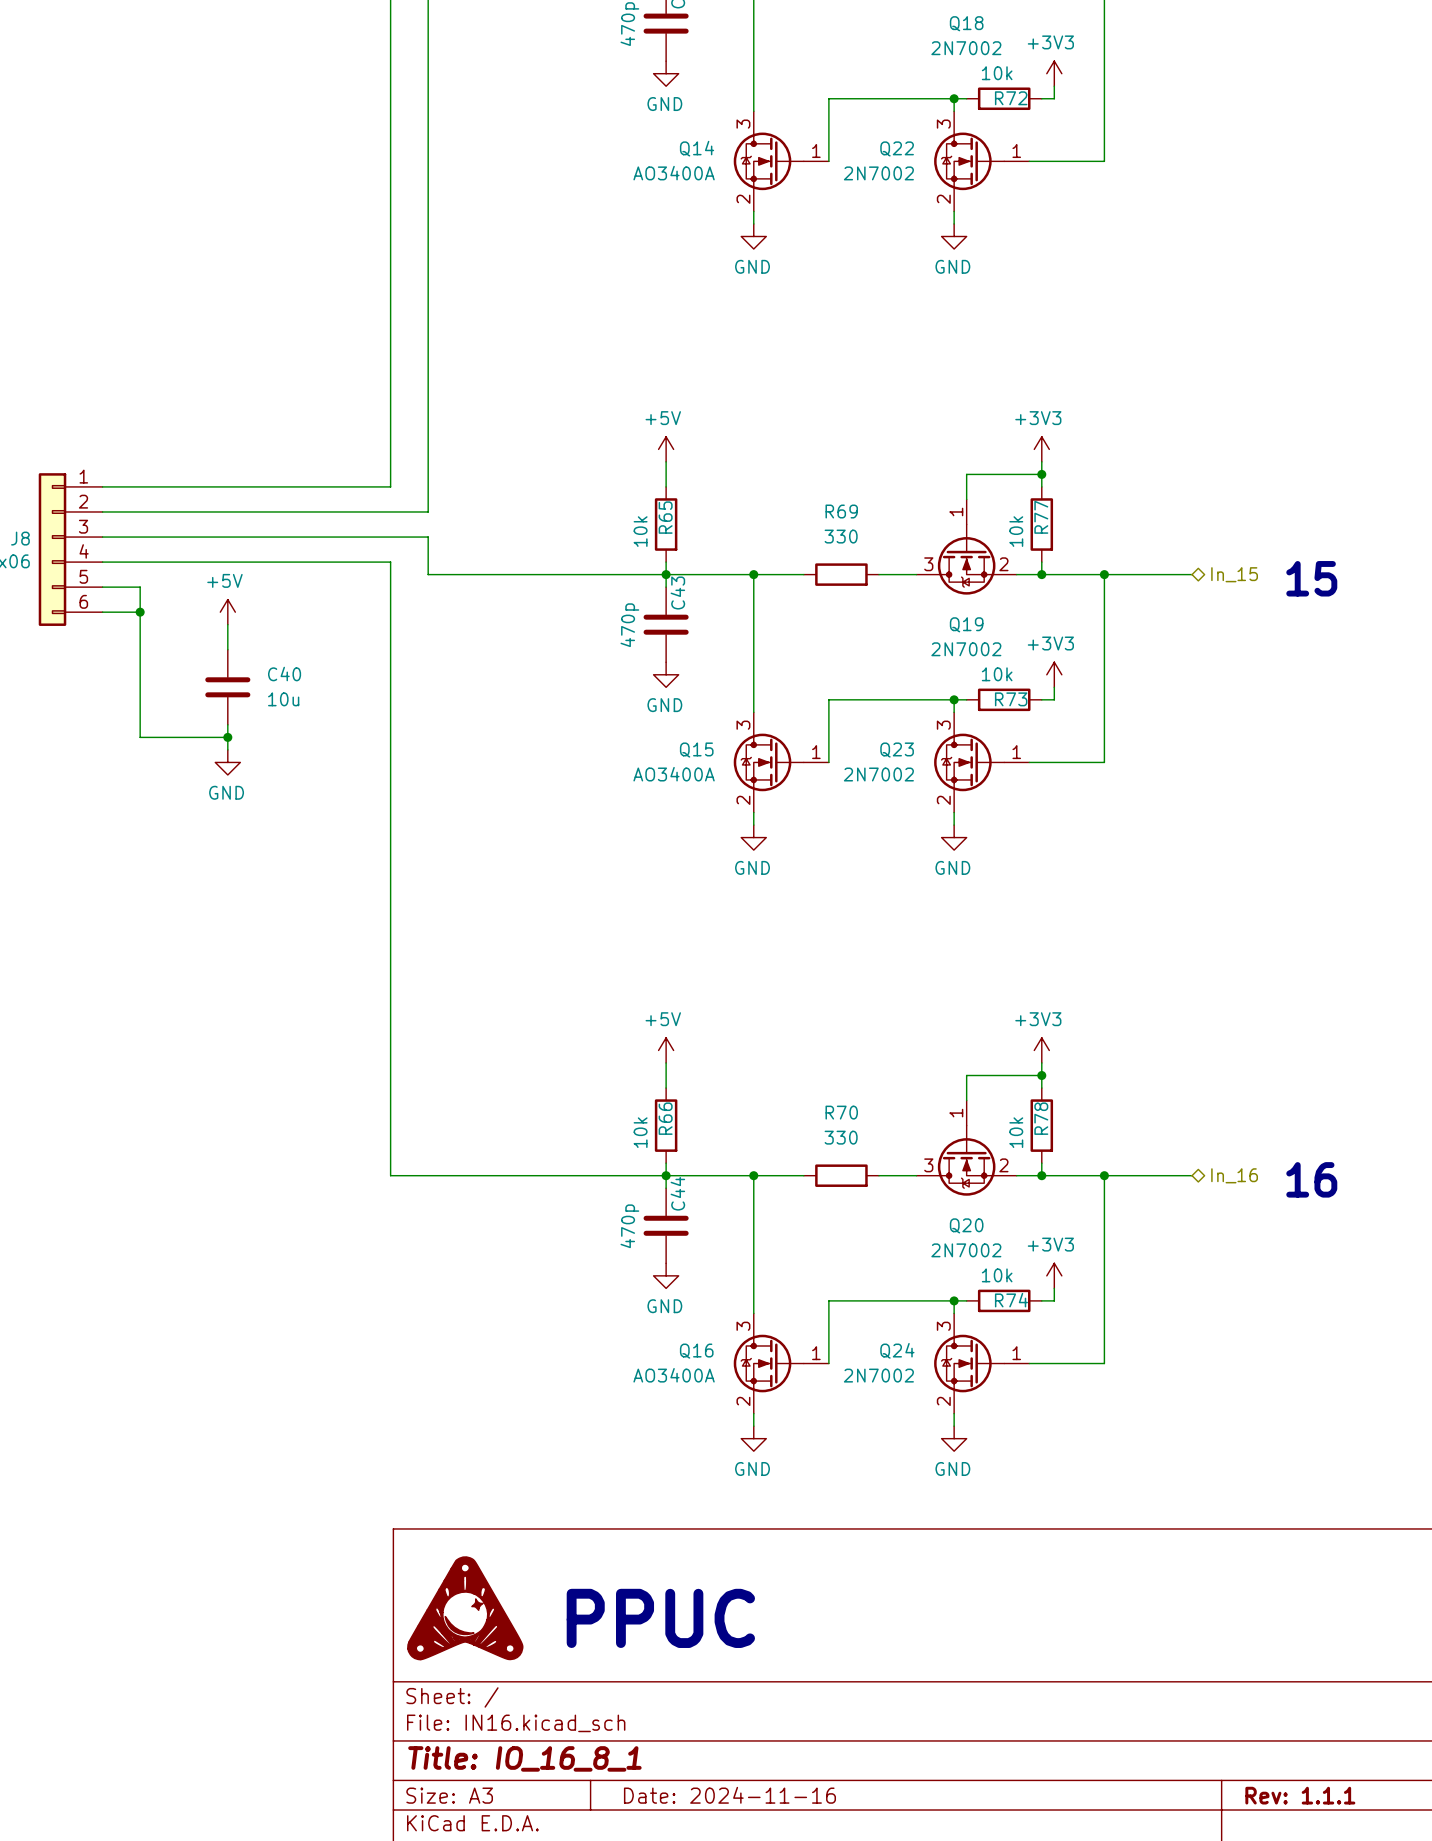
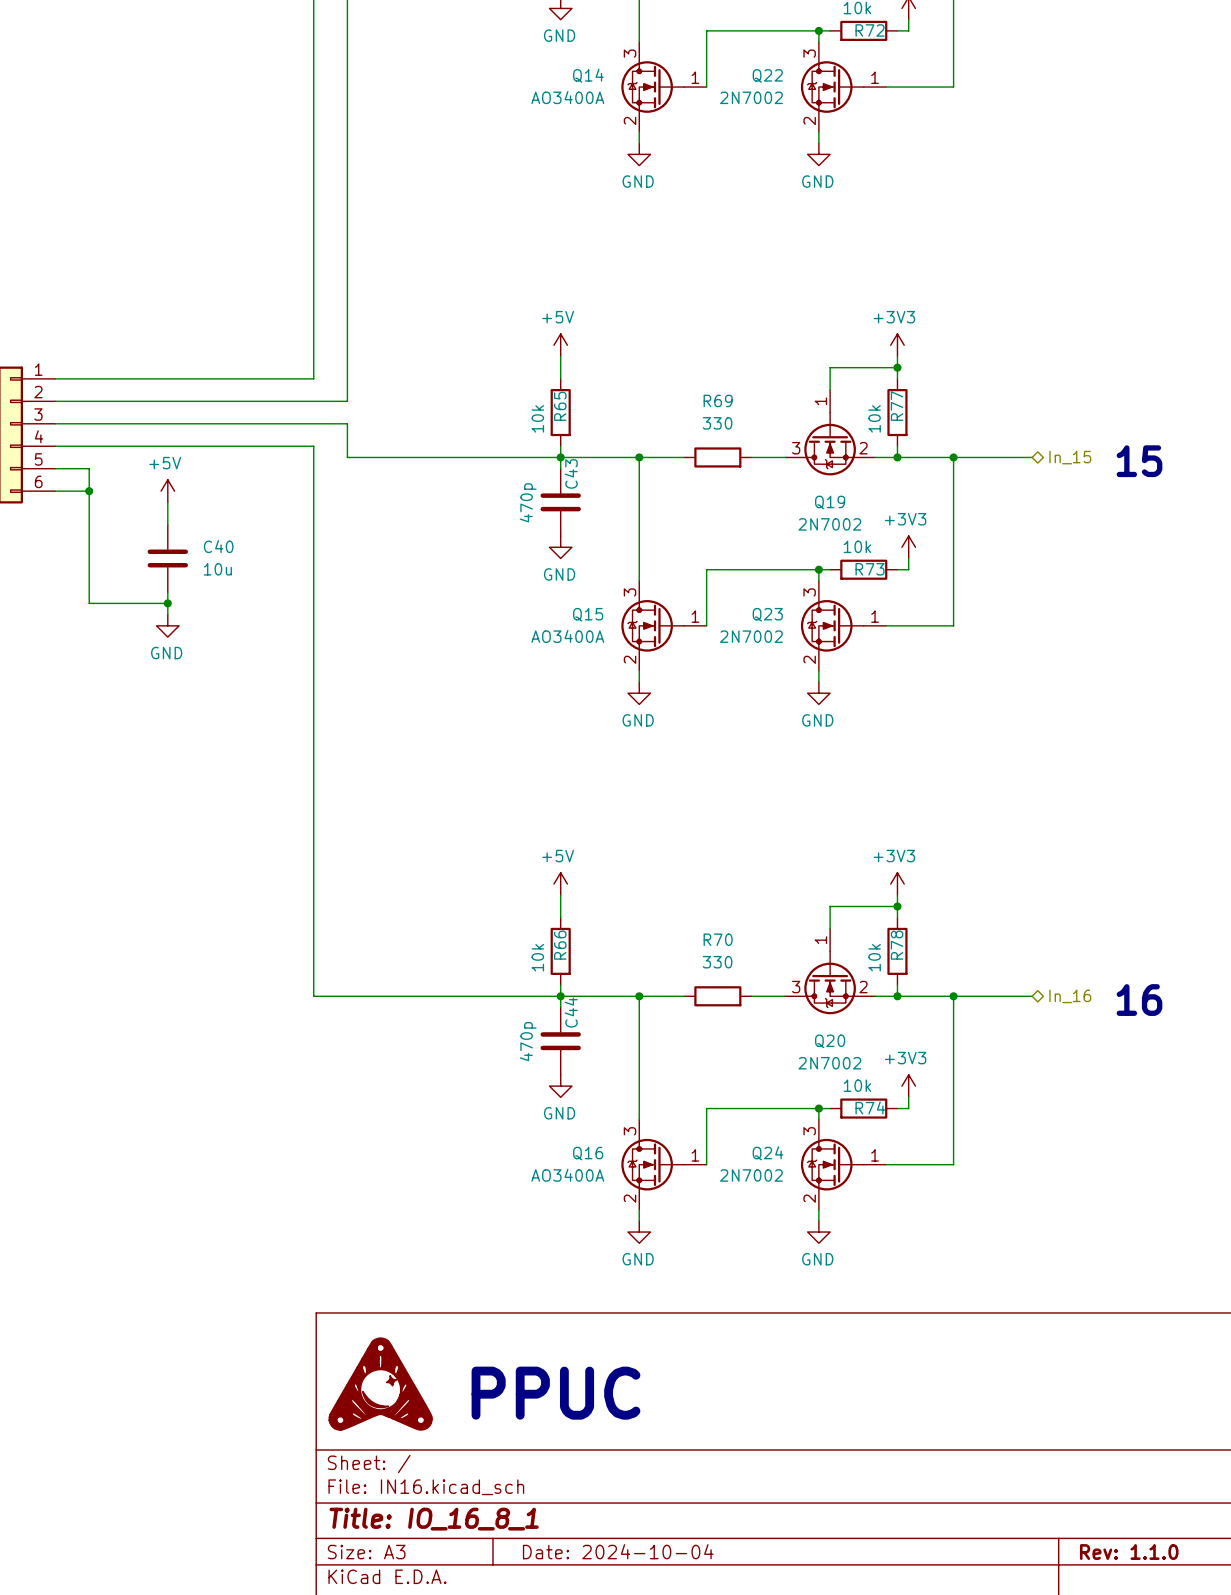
title block: Date: 2024-11-16 (729, 1795) -> Date: 2024-10-04 (618, 1551)
title block: Rev: 1.1.1 (1300, 1795) -> Rev: 1.1.0 (1129, 1552)

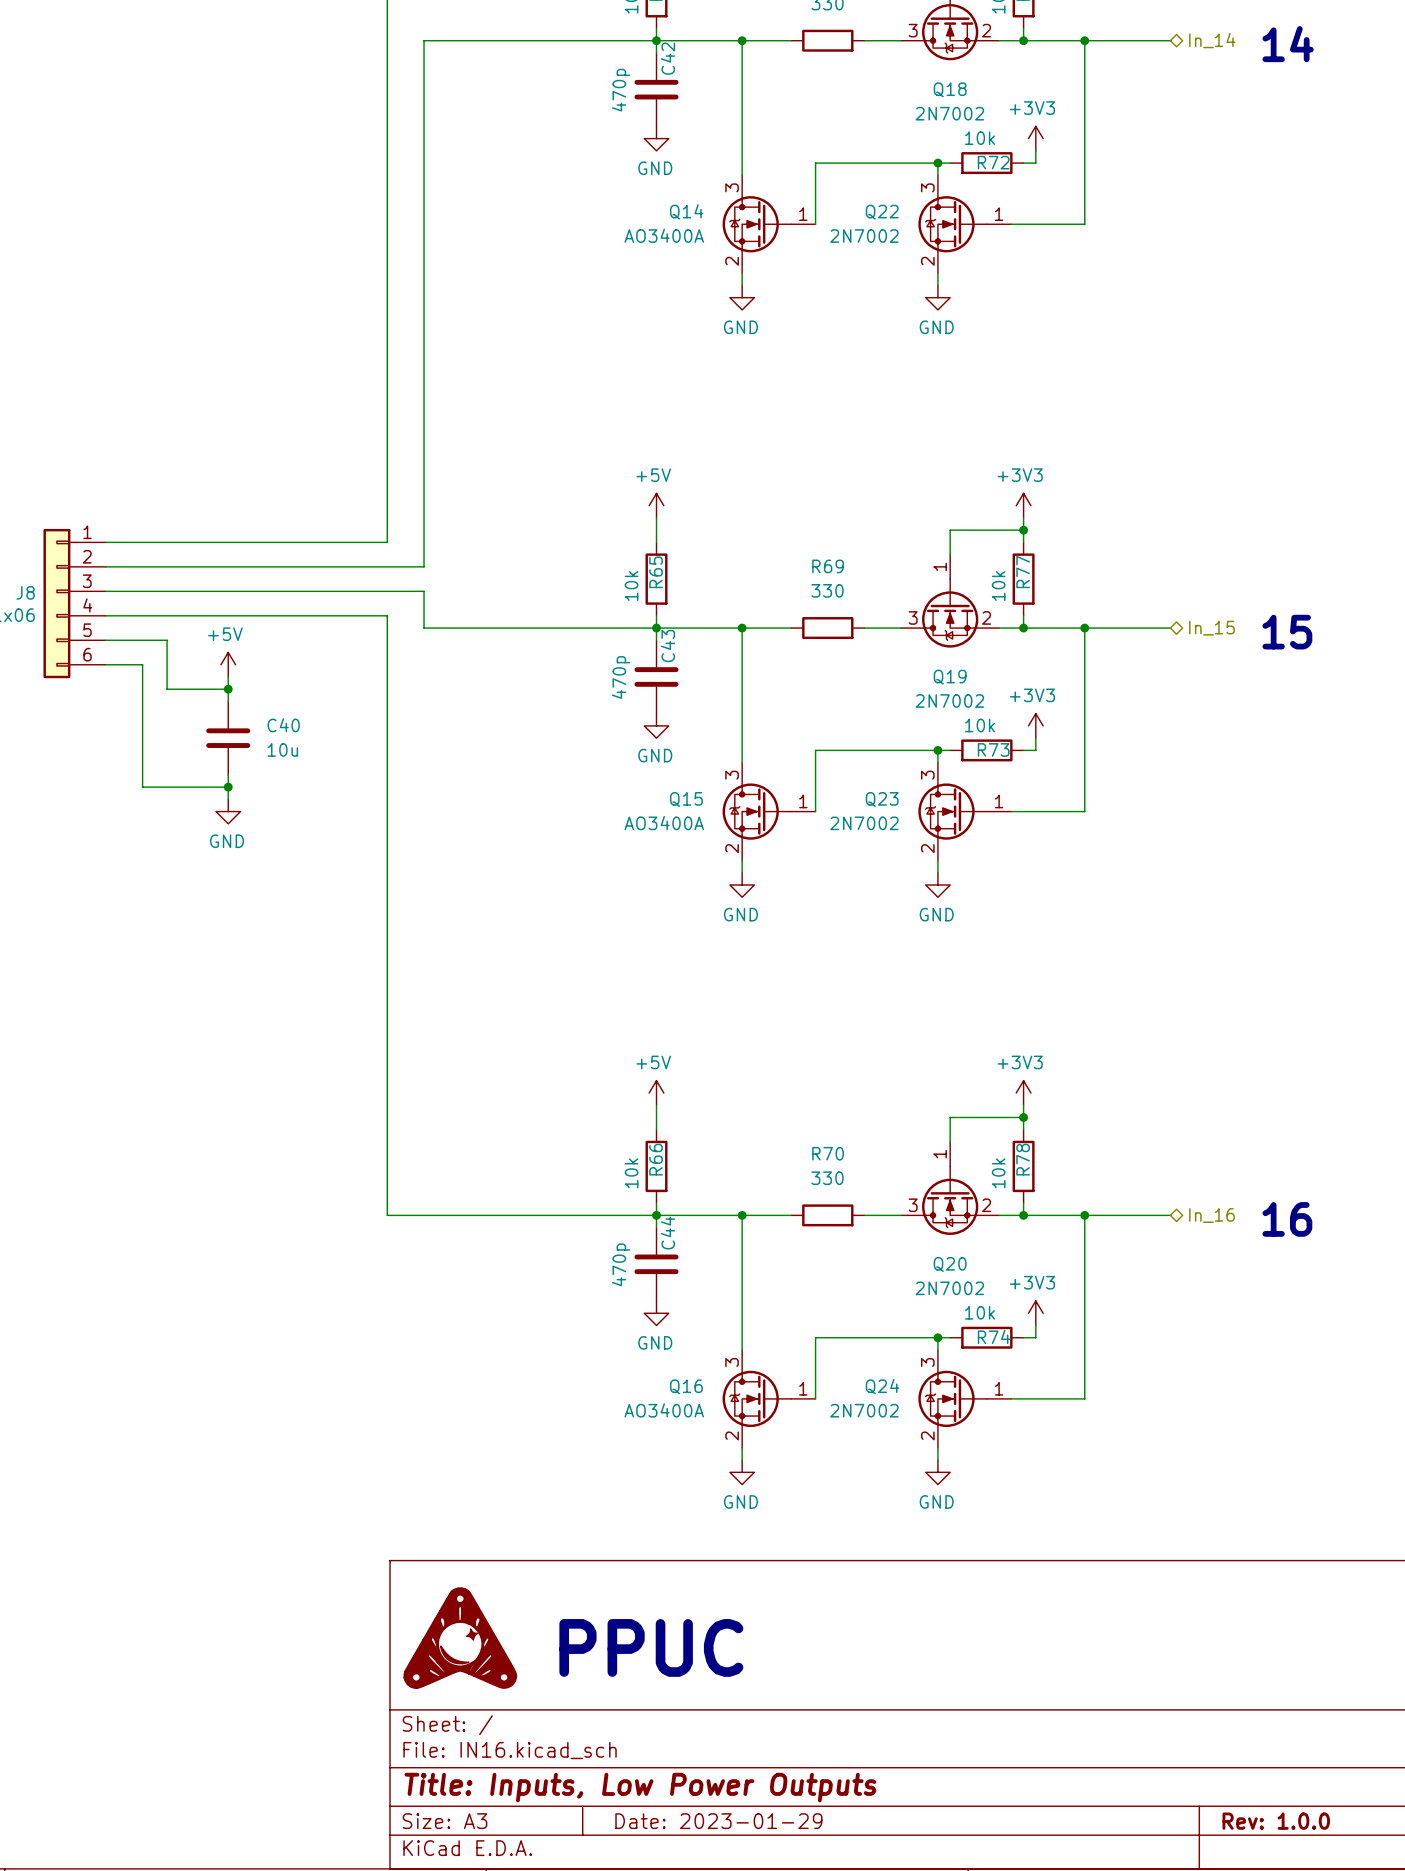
wire: (89, 468) (89, 491) -> (142, 640) (167, 640) (167, 689) (228, 689)
junction: (89, 491) -> none
junction: none -> (228, 689)
title block: Title: IO_16_8_1 (434, 1519) -> Title: Inputs, Low Power Outputs (640, 1787)
title block: Date: 2024-10-04 (618, 1551) -> Date: 2023-01-29 (718, 1821)
title block: Rev: 1.1.0 (1129, 1552) -> Rev: 1.0.0 (1276, 1821)

